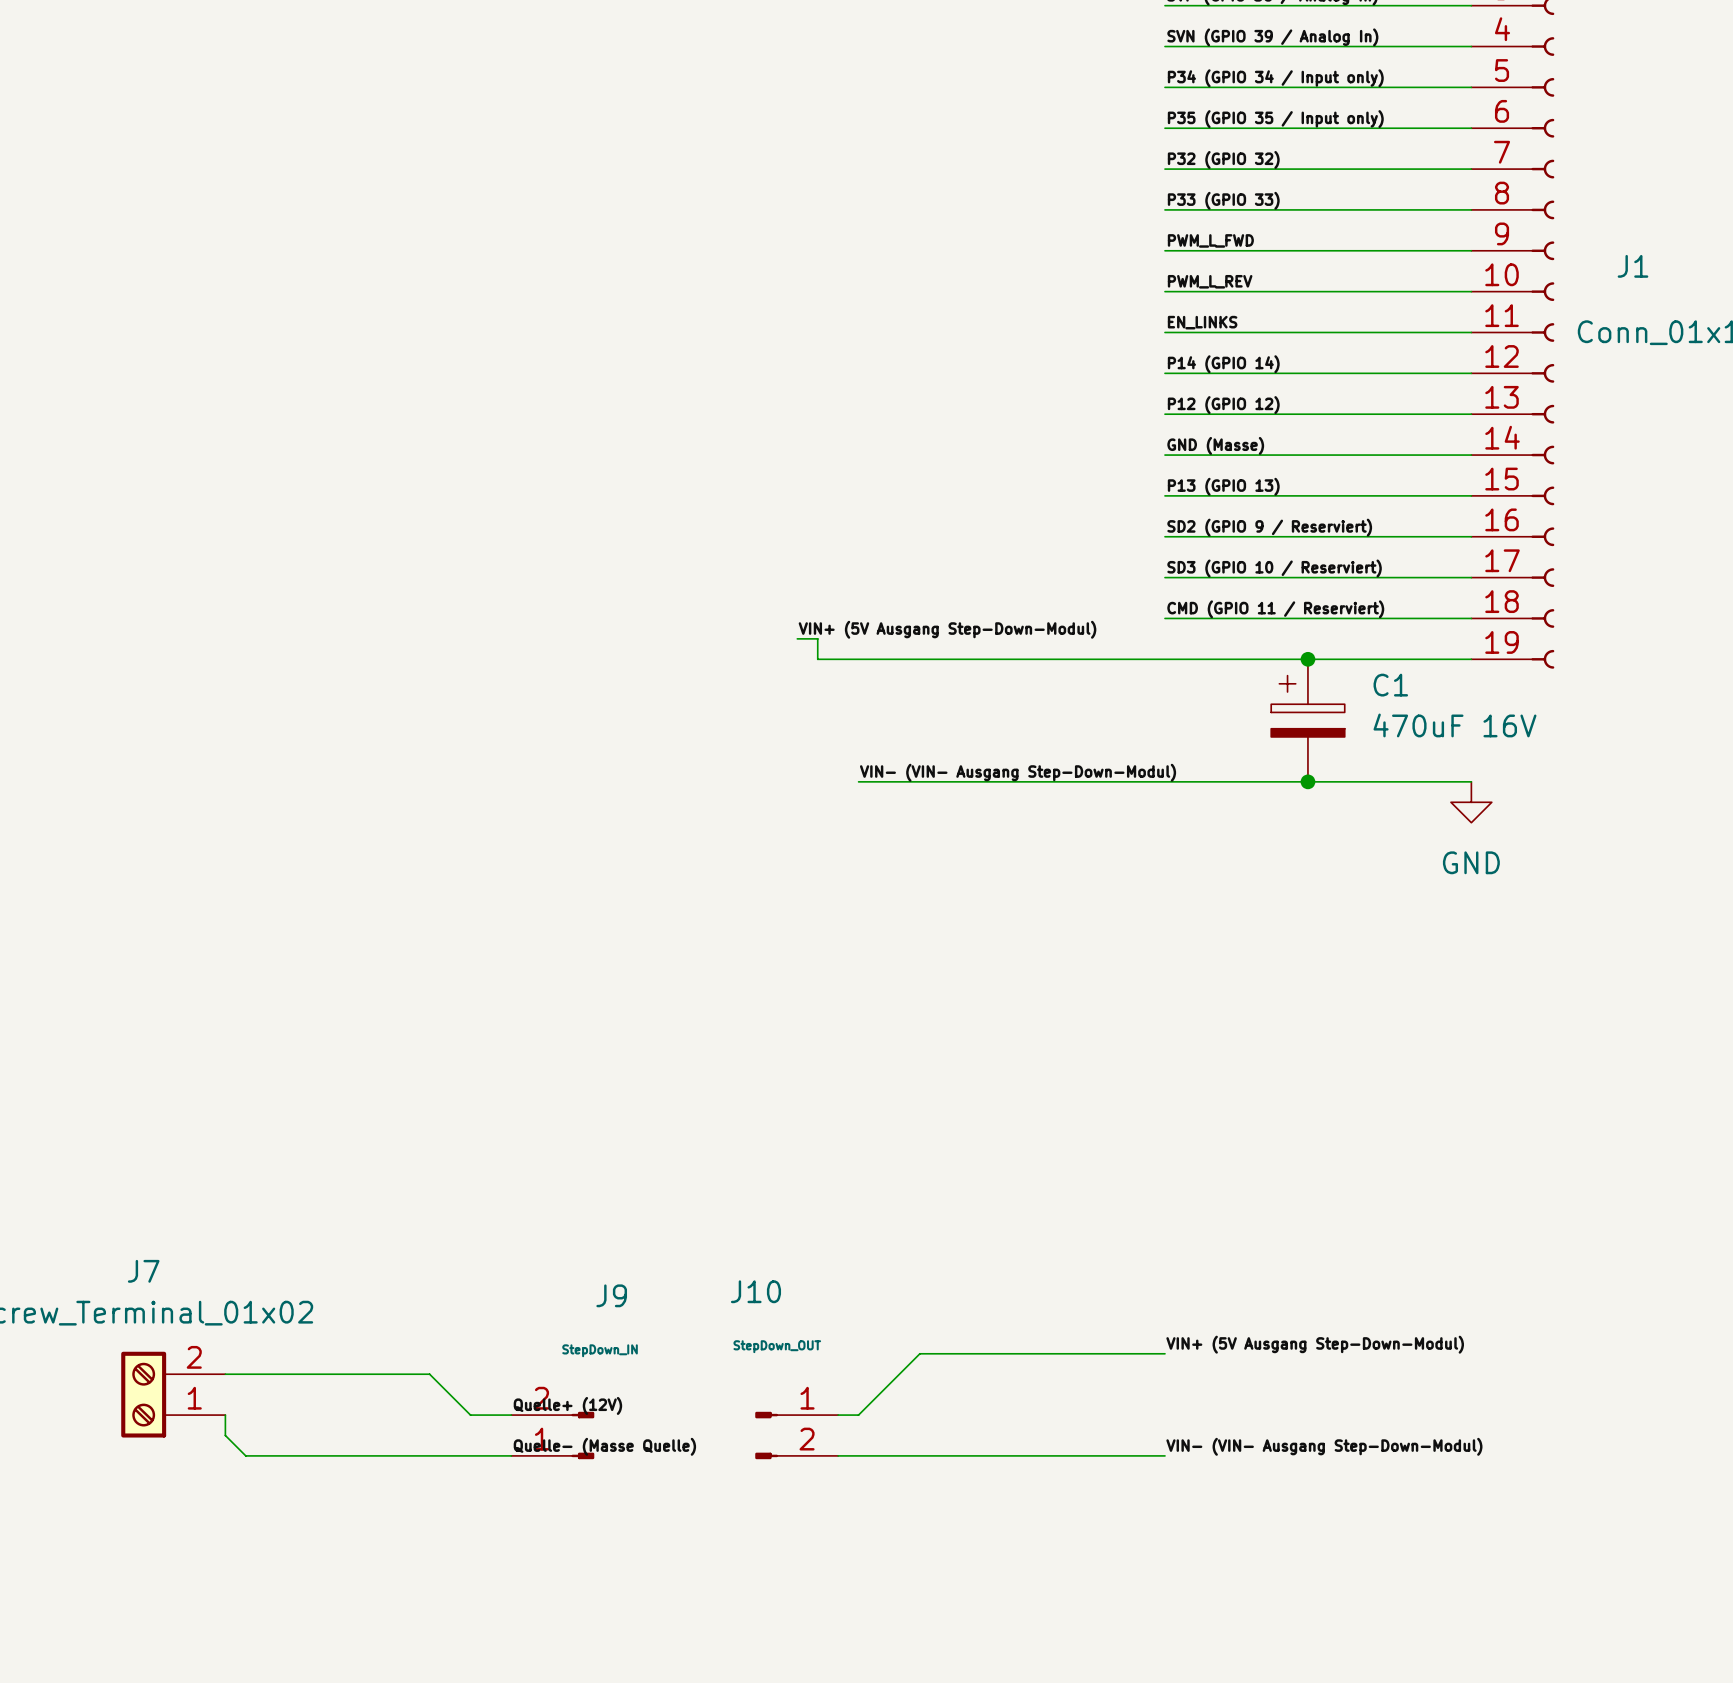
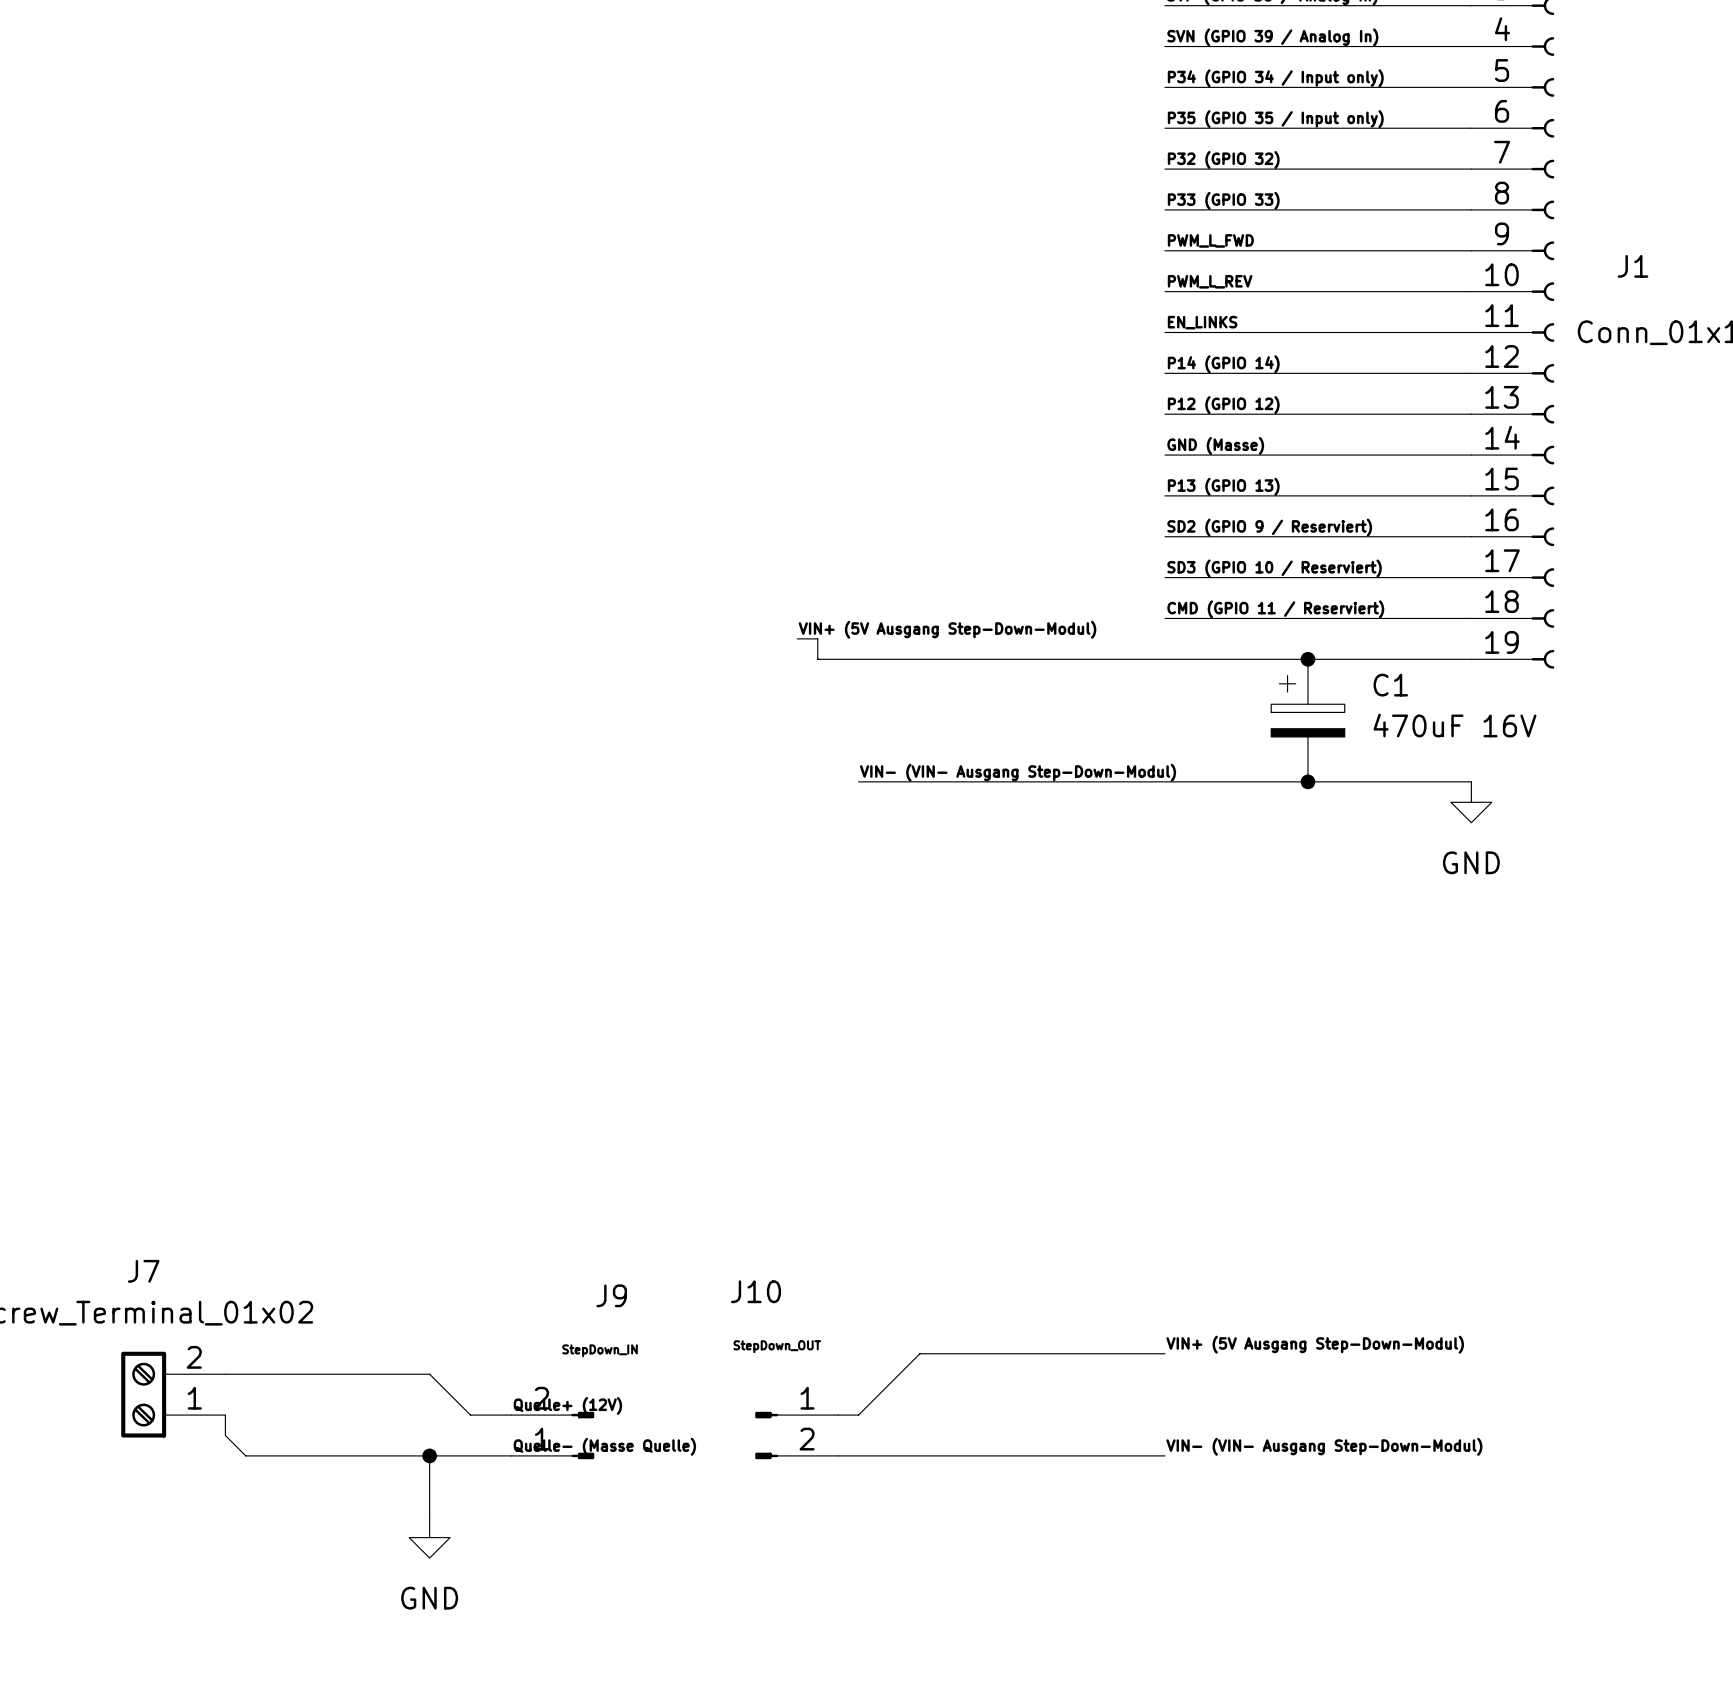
wire: none -> (429, 1455) (429, 1517)
junction: none -> (429, 1455)
power symbol: none -> GND (429, 1537)

